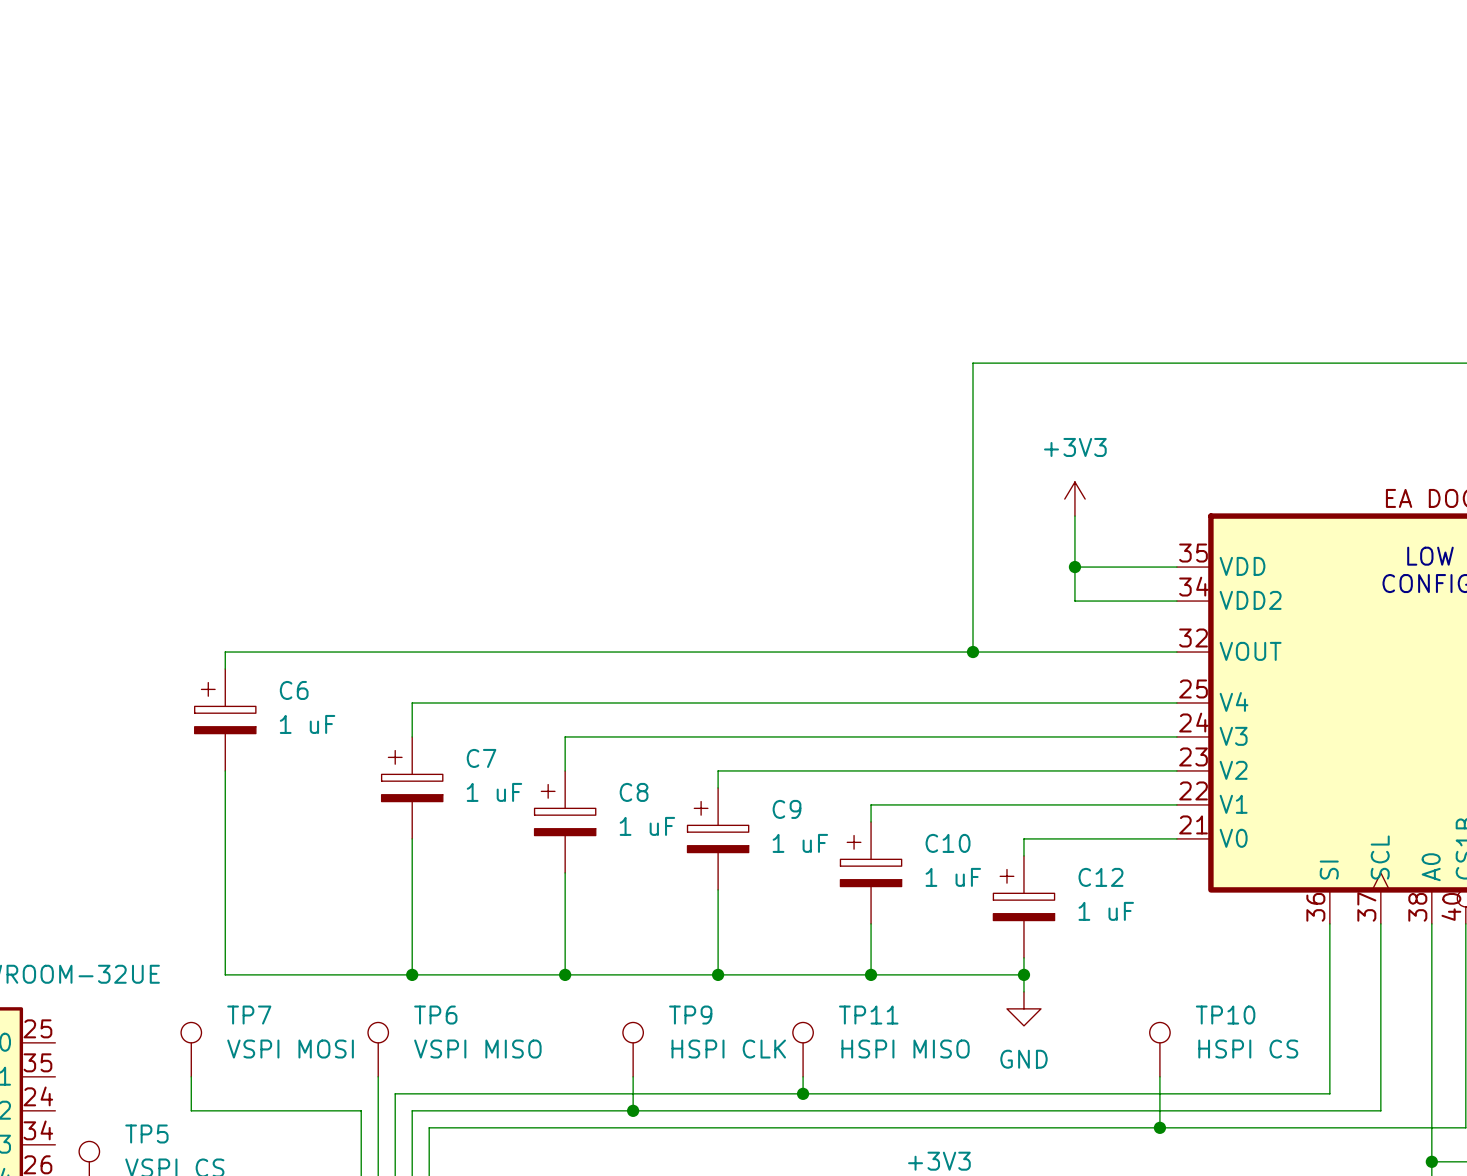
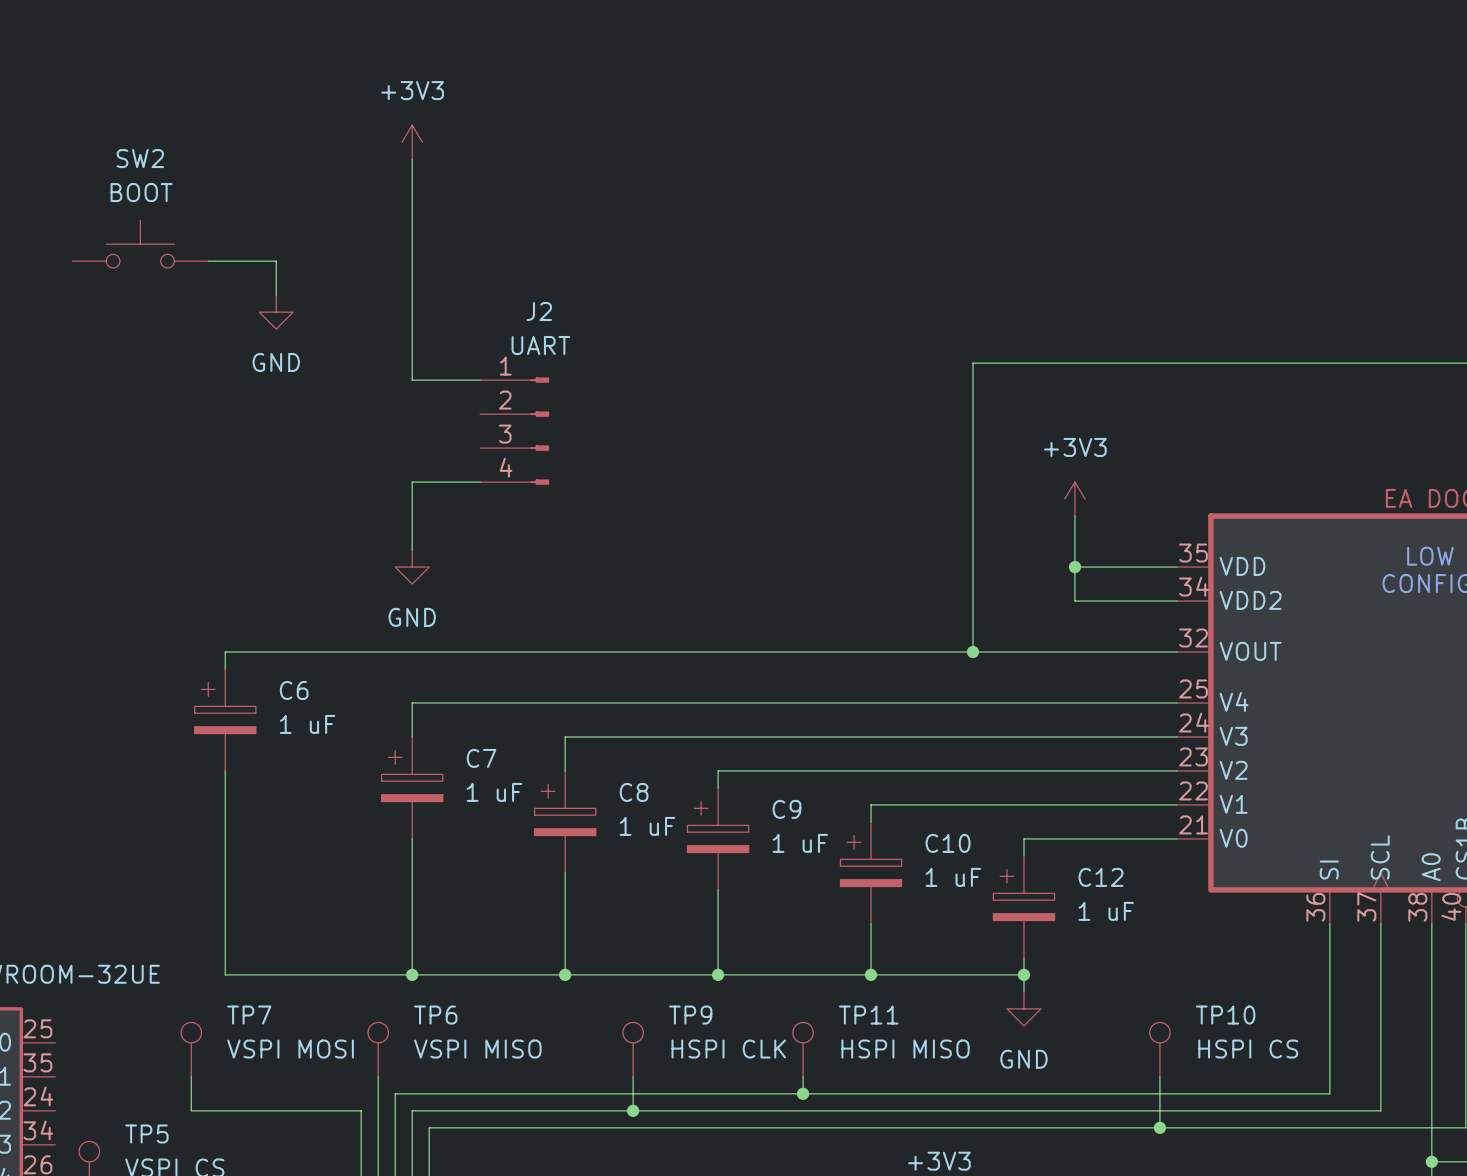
power symbol: none -> +3V3 (412, 142)
wire: none -> (412, 159) (412, 380) (480, 380)
SW2: none -> BOOT (140, 244)
wire: none -> (208, 261) (276, 261) (276, 295)
power symbol: none -> GND (276, 312)
J2: none -> UART (514, 431)
wire: none -> (480, 482) (412, 482) (412, 550)
power symbol: none -> GND (412, 567)

